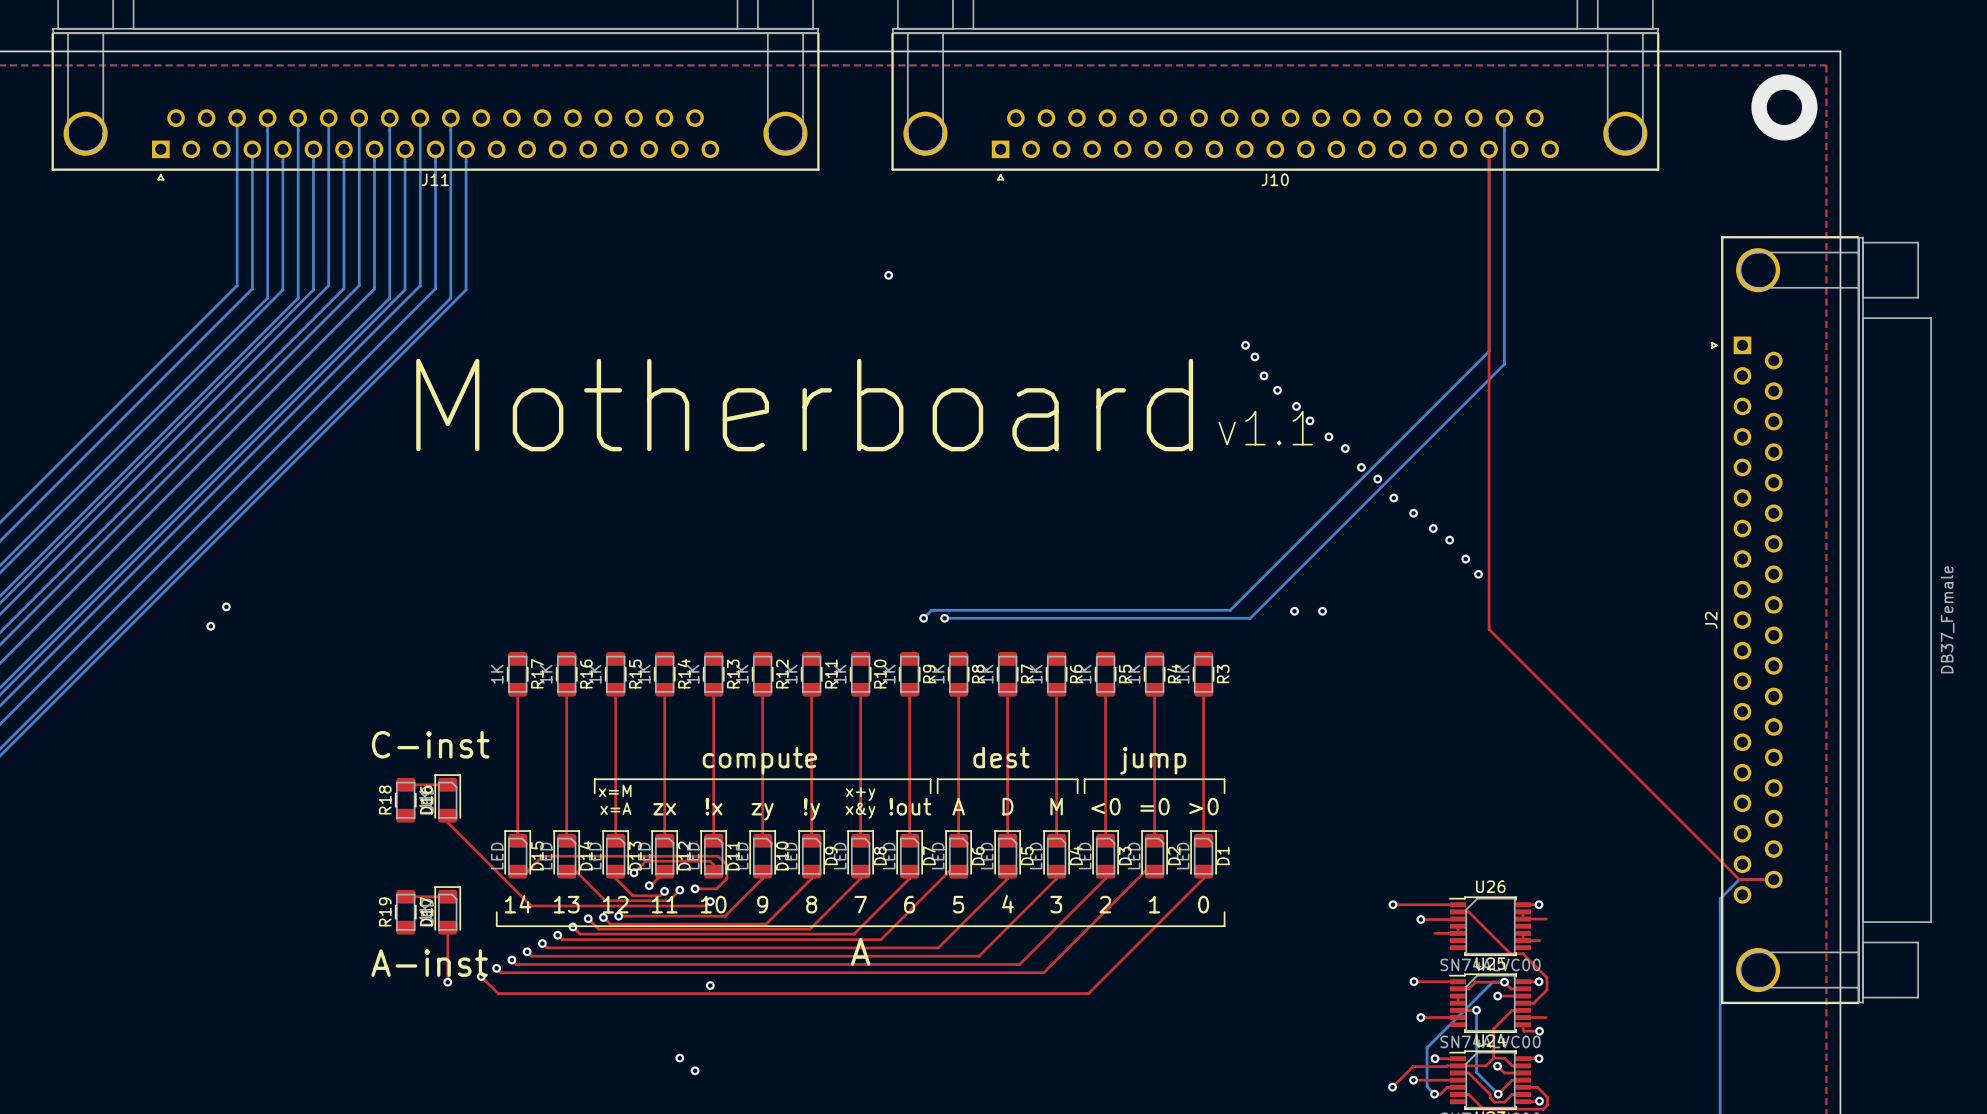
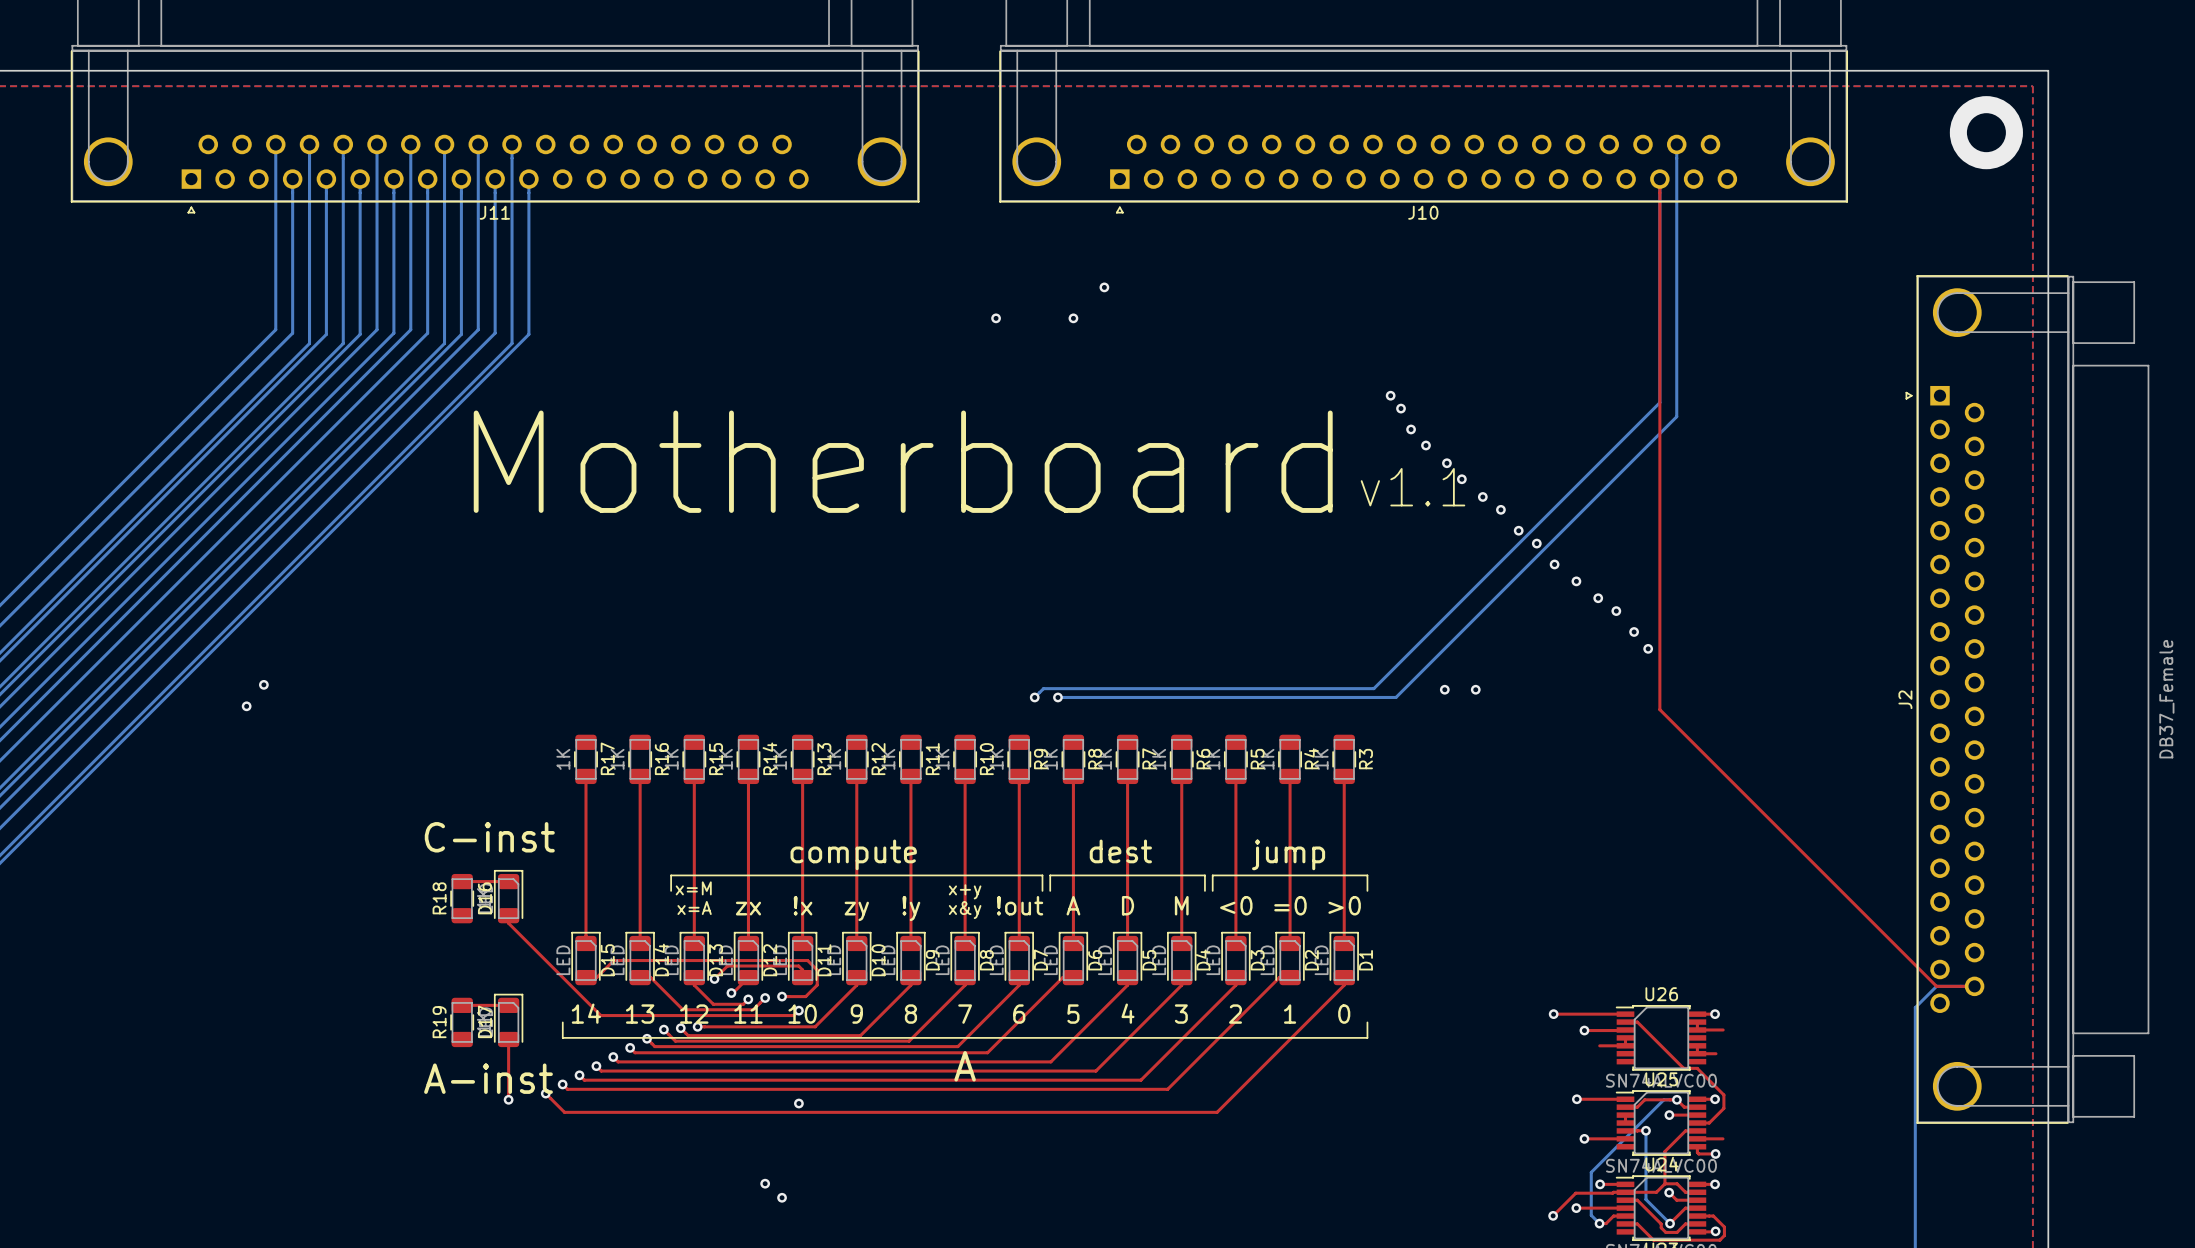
via: none -> (1104, 287)
via: none -> (1073, 318)

